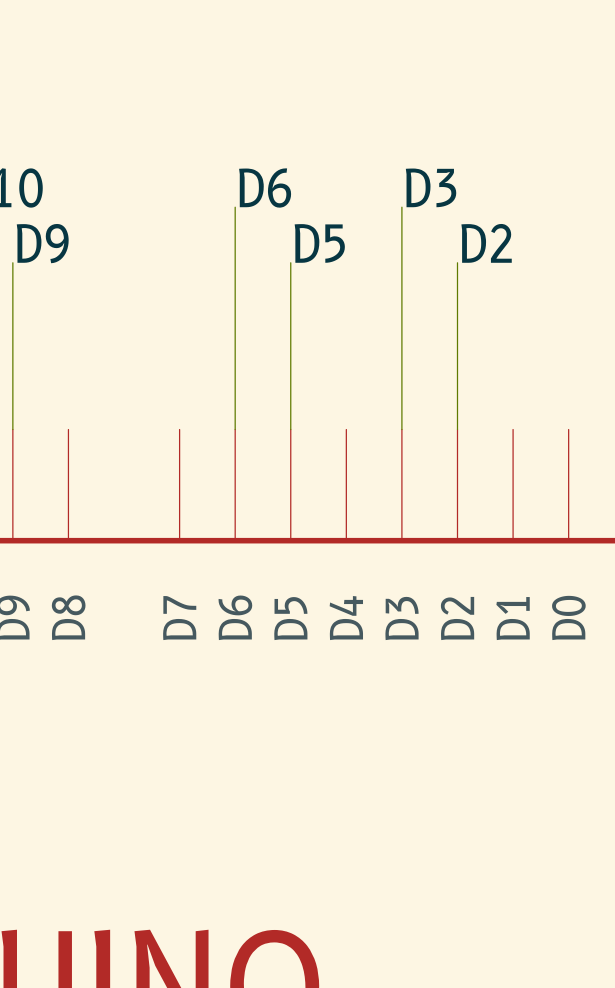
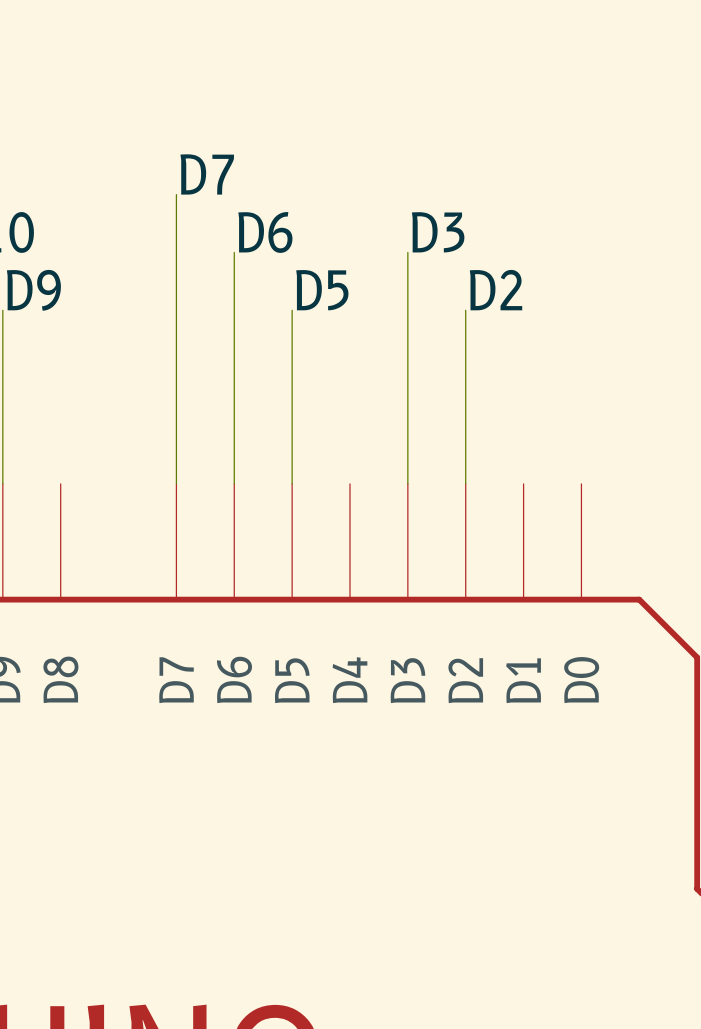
label: none -> D7 (207, 174)
wire: none -> (176, 194) (176, 483)

